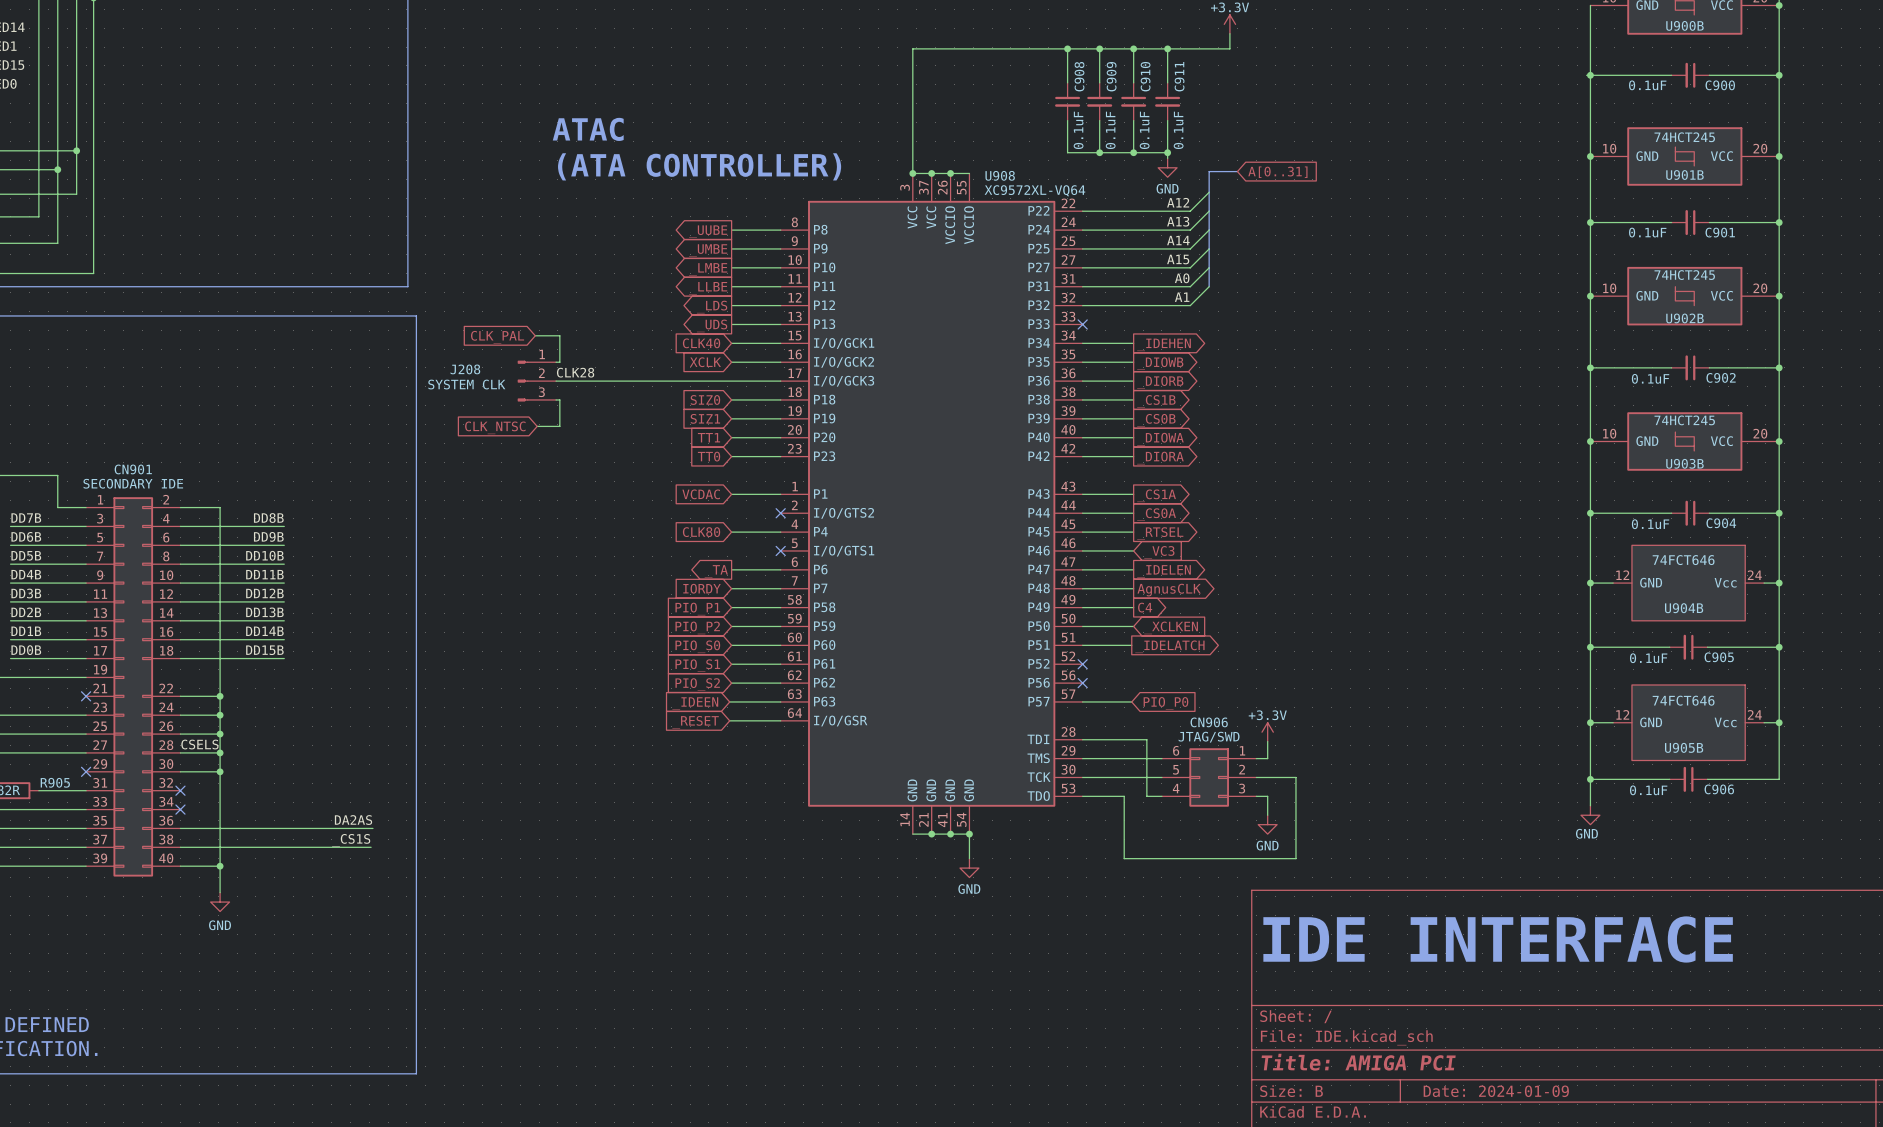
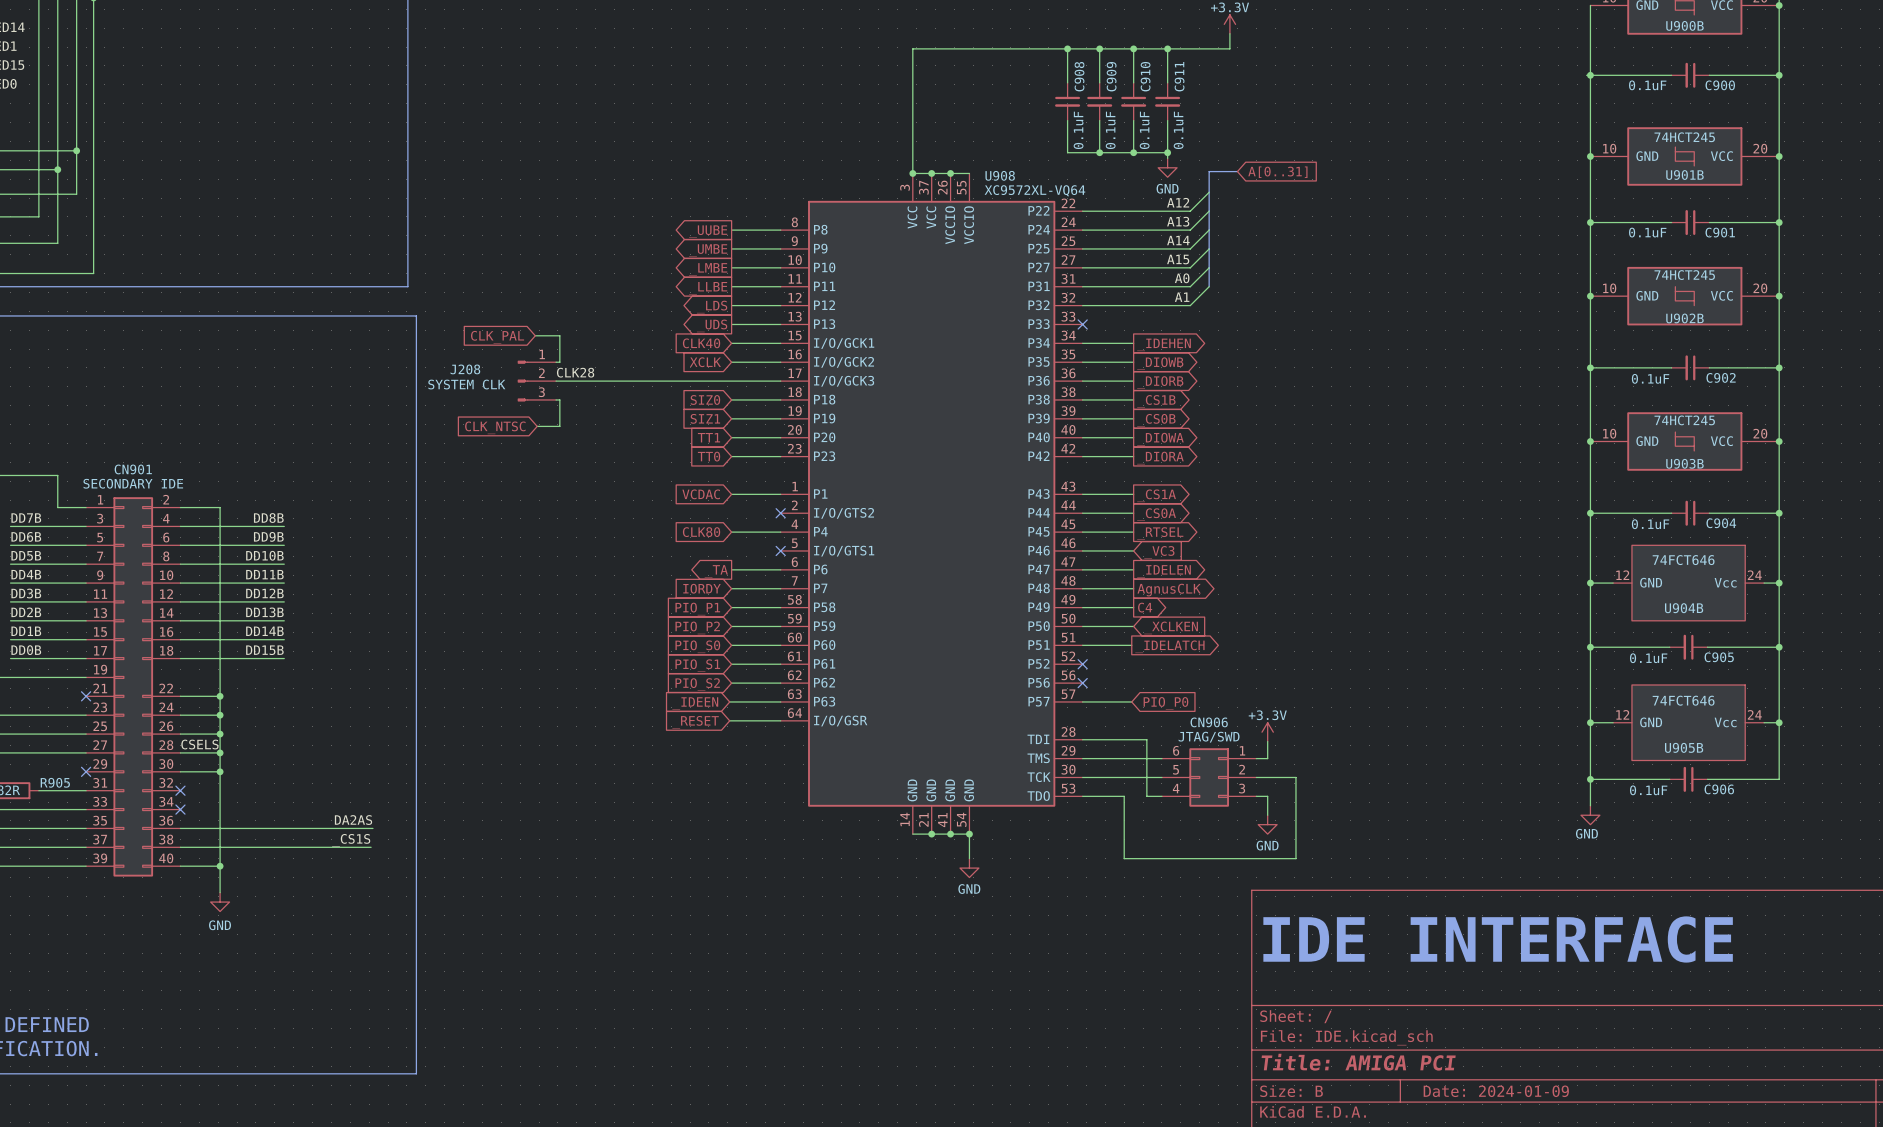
text: ATAC (588, 129) -> none
text: (ATA CONTROLLER) (699, 166) -> none

